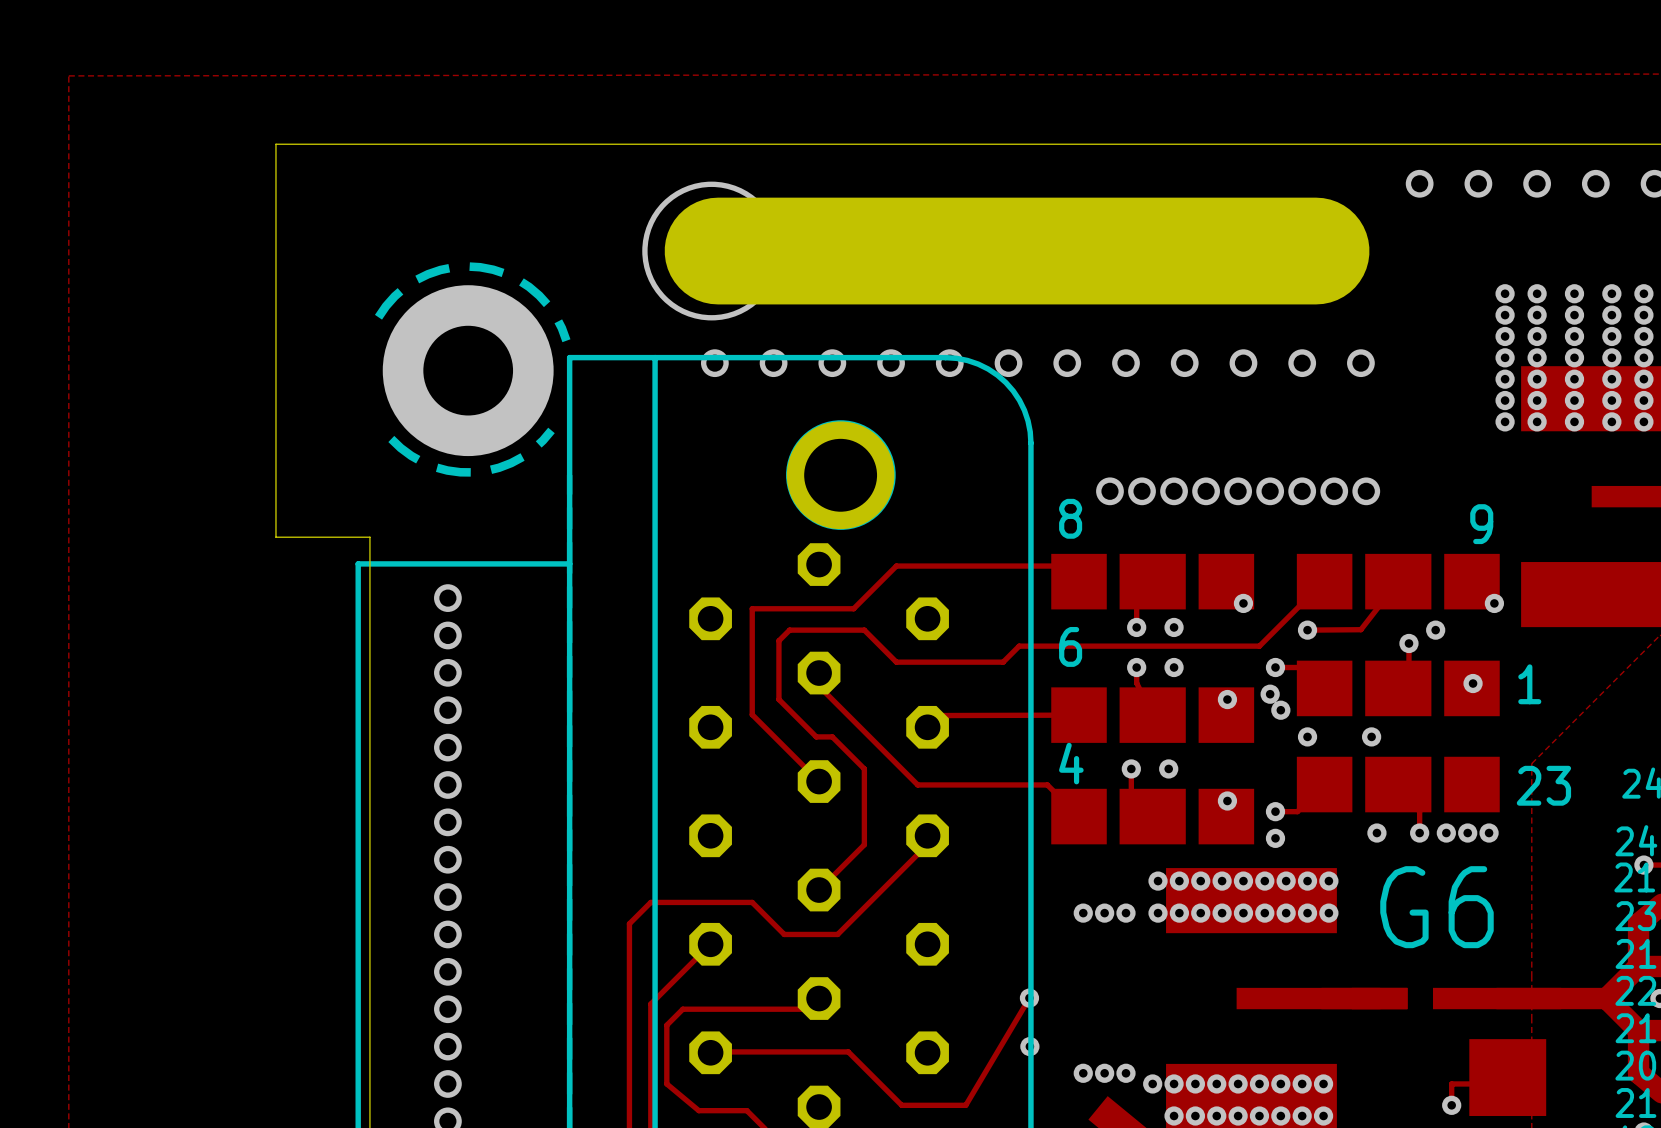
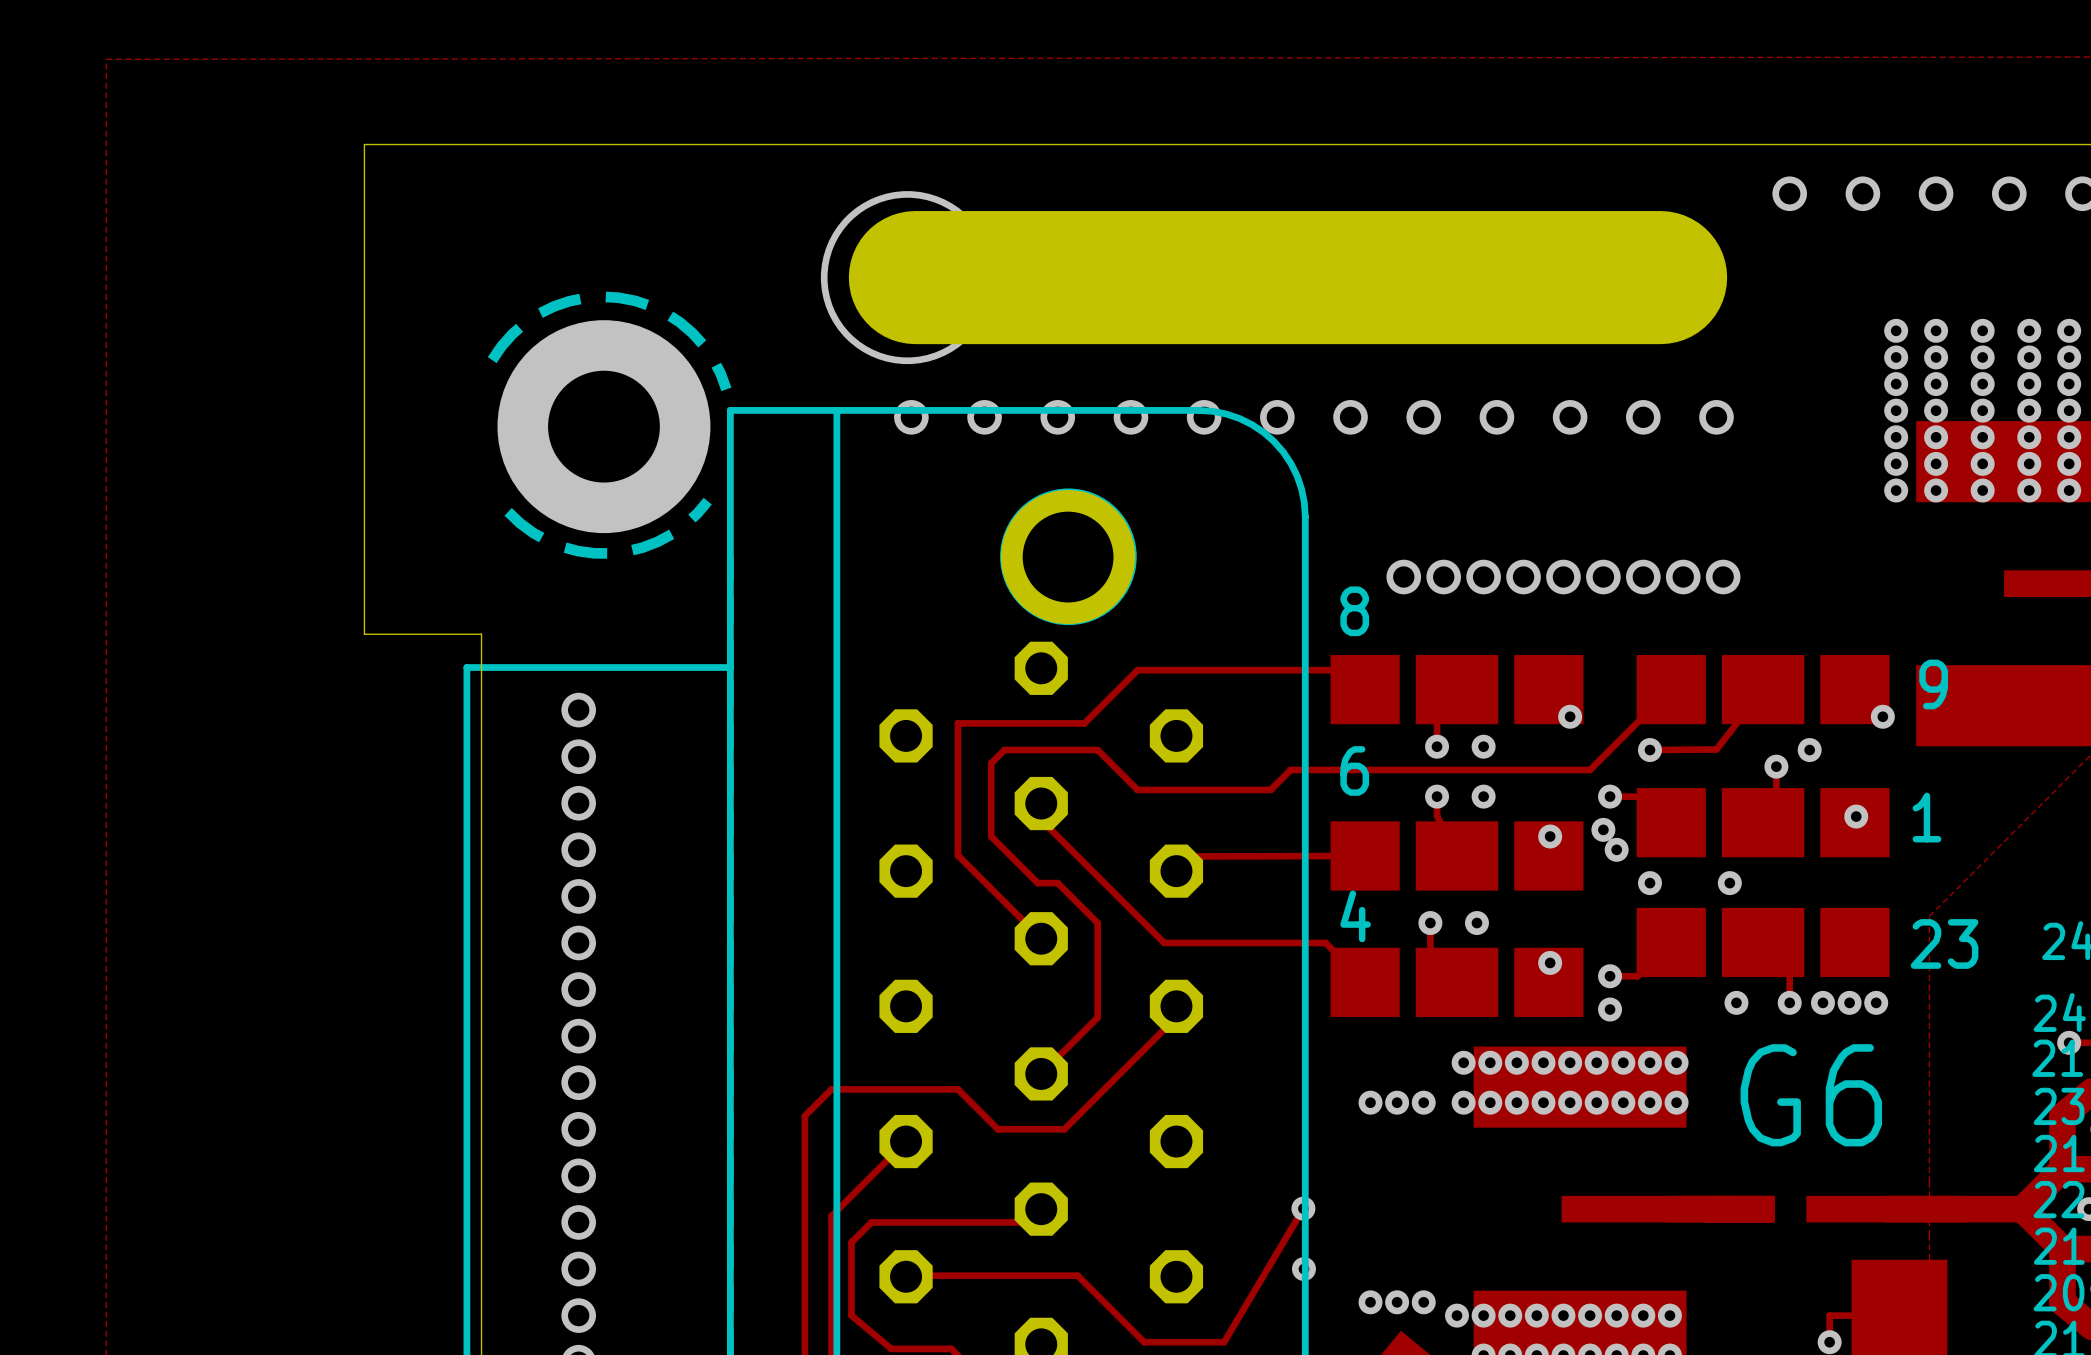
text position: 9 (1481, 524) -> 9 (1933, 684)

